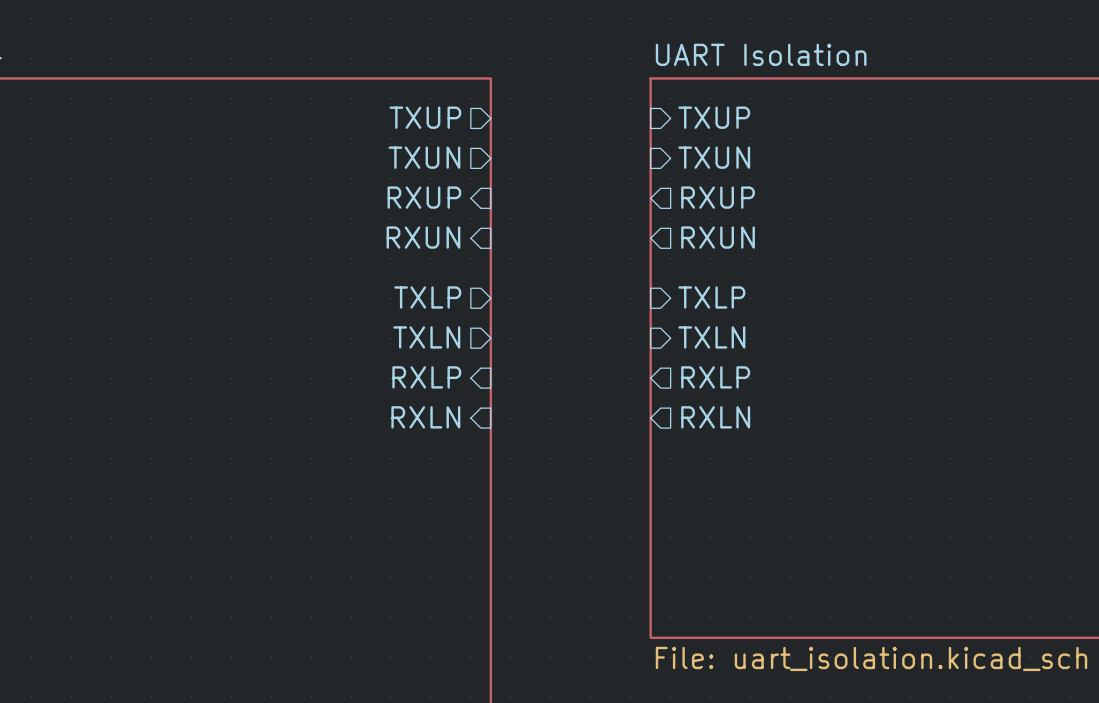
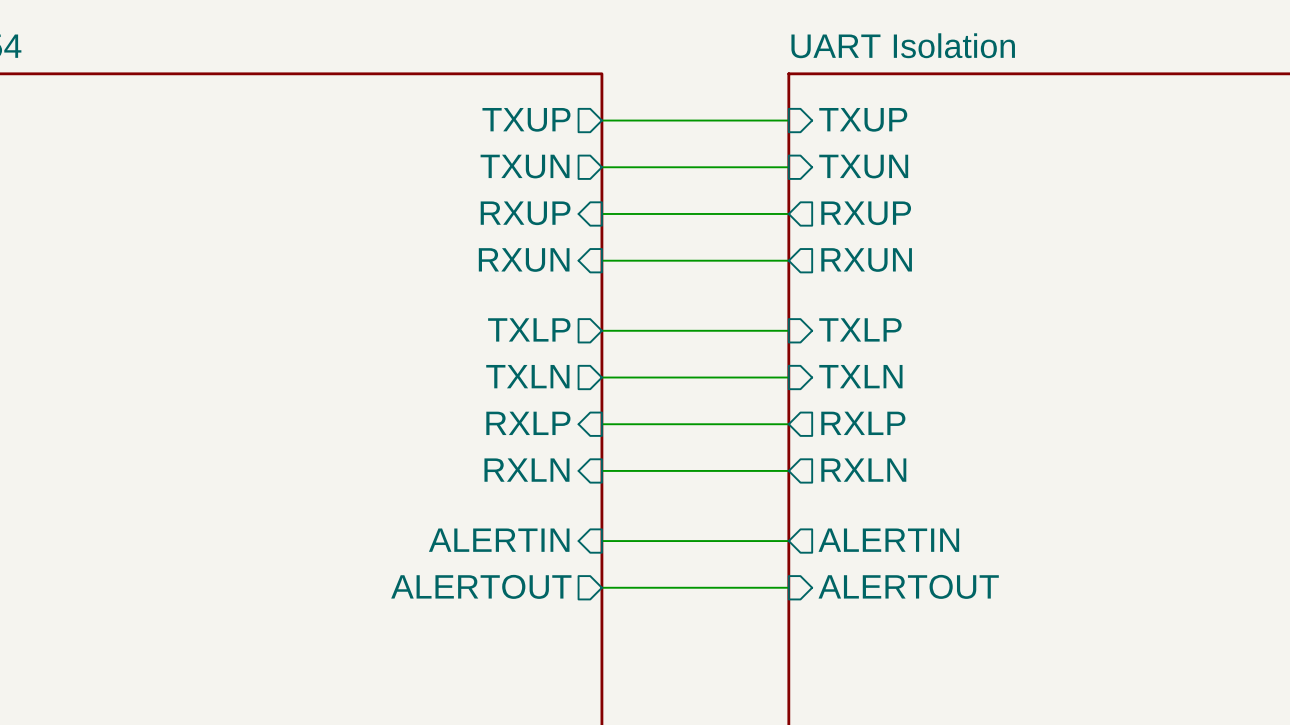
wire: none -> (601, 120) (788, 120)
wire: none -> (601, 167) (788, 167)
wire: none -> (601, 213) (788, 213)
wire: none -> (601, 260) (788, 260)
wire: none -> (601, 330) (788, 330)
wire: none -> (601, 377) (788, 377)
wire: none -> (601, 424) (788, 424)
wire: none -> (601, 470) (788, 470)
sheet pin: none -> ALERTIN (499, 540)
sheet pin: none -> ALERTIN (888, 540)
wire: none -> (601, 541) (788, 541)
sheet pin: none -> ALERTOUT (481, 586)
wire: none -> (601, 587) (788, 587)
sheet pin: none -> ALERTOUT (908, 586)

